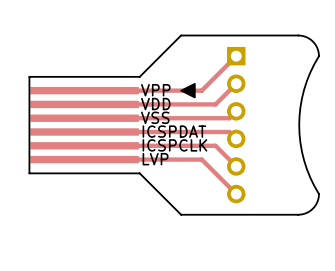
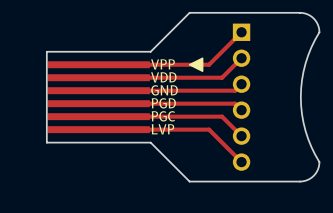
text: VSS (155, 117) -> GND (164, 90)
text: ICSPDAT (174, 131) -> PGD (163, 103)
text: ICSPCLK (174, 145) -> PGC (163, 116)

